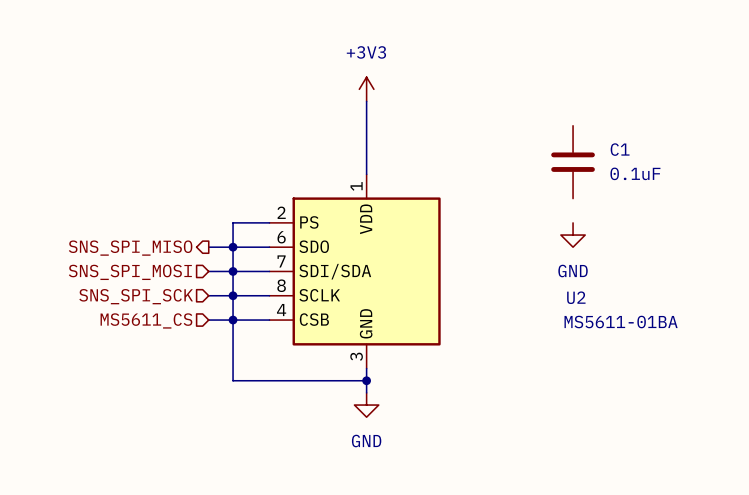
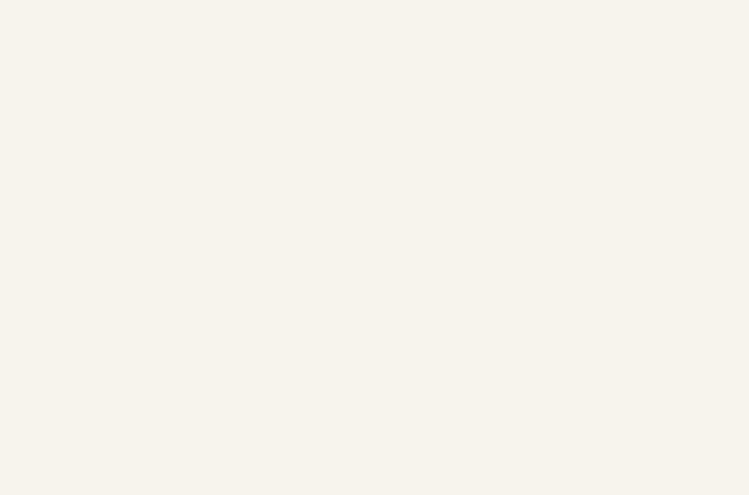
power symbol: +3V3 (366, 89) -> none
wire: (366, 101) (366, 174) -> none
C1: 0.1uF (573, 162) -> none
wire: (269, 222) (233, 222) (233, 380) (366, 380) -> none
power symbol: GND (573, 235) -> none
wire: (208, 247) (269, 247) -> none
junction: (233, 247) -> none
hierarchical label: SNS_SPI_MISO (130, 248) -> none
wire: (208, 271) (269, 271) -> none
junction: (233, 271) -> none
U2: MS5611-01BA (355, 271) -> none
hierarchical label: SNS_SPI_MOSI (130, 272) -> none
wire: (208, 295) (269, 295) -> none
junction: (233, 295) -> none
hierarchical label: SNS_SPI_SCK (136, 296) -> none
hierarchical label: MS5611_CS (146, 320) -> none
wire: (208, 320) (269, 320) -> none
junction: (233, 320) -> none
wire: (366, 368) (366, 392) -> none
junction: (366, 380) -> none
power symbol: GND (366, 405) -> none

